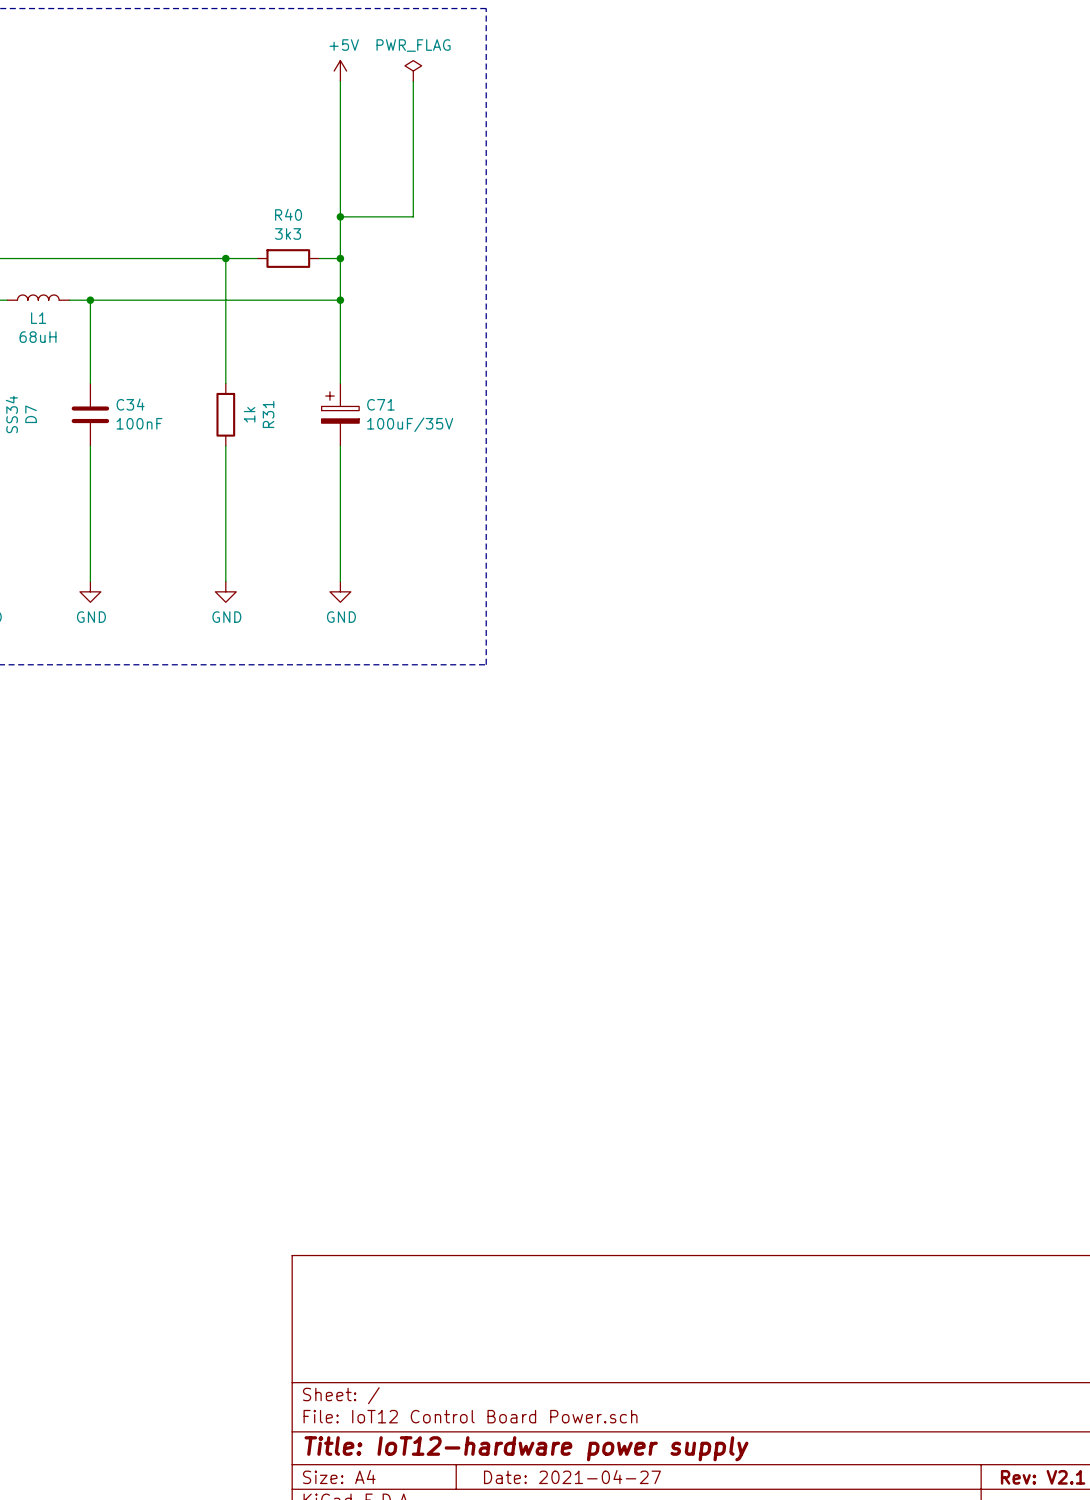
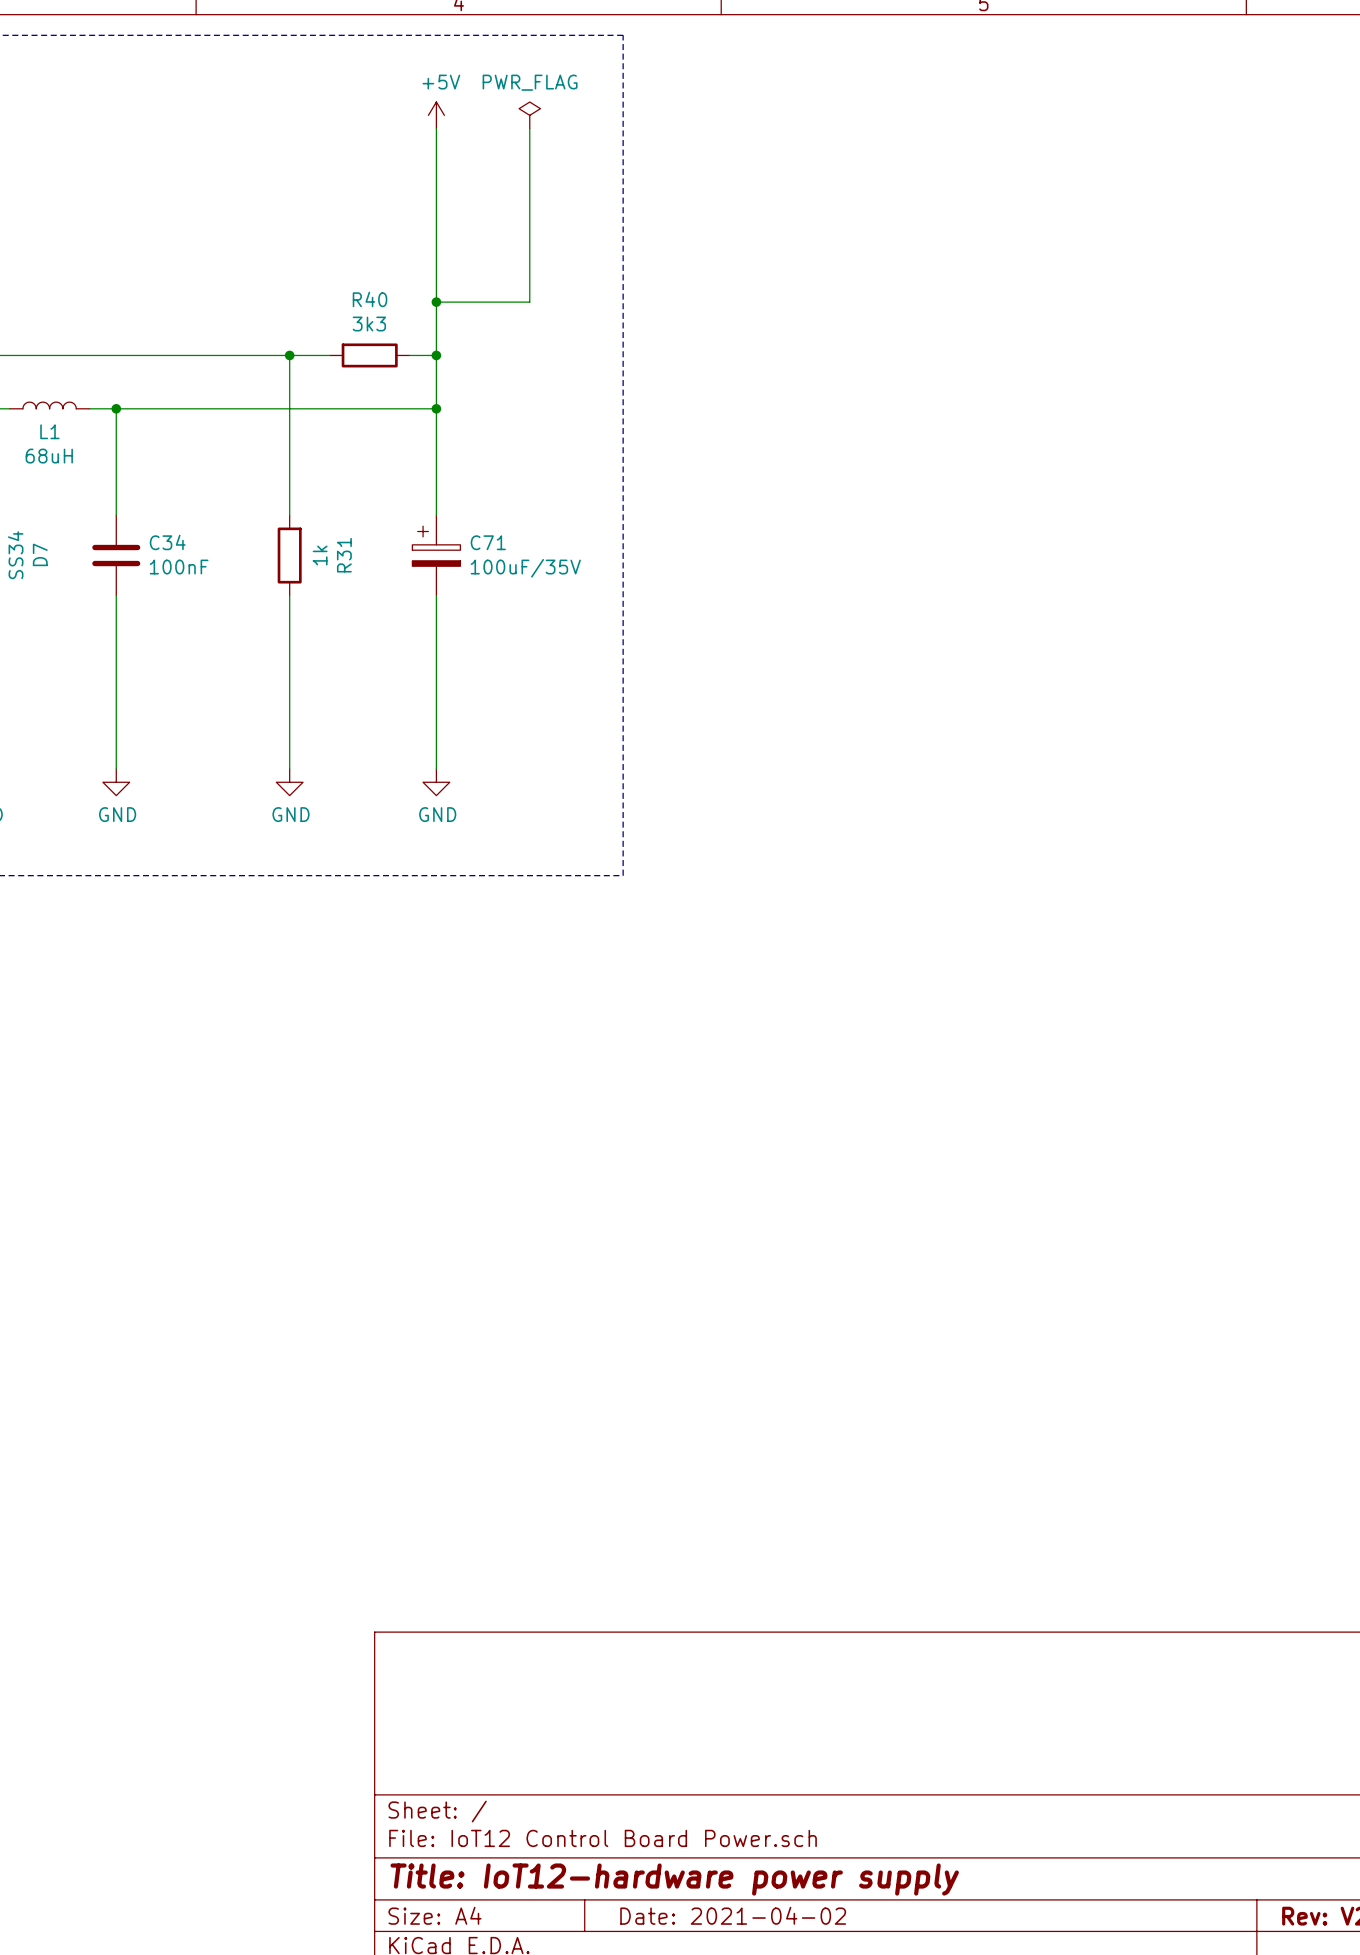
title block: Date: 2021-04-27 (572, 1477) -> Date: 2021-04-02 (733, 1915)

